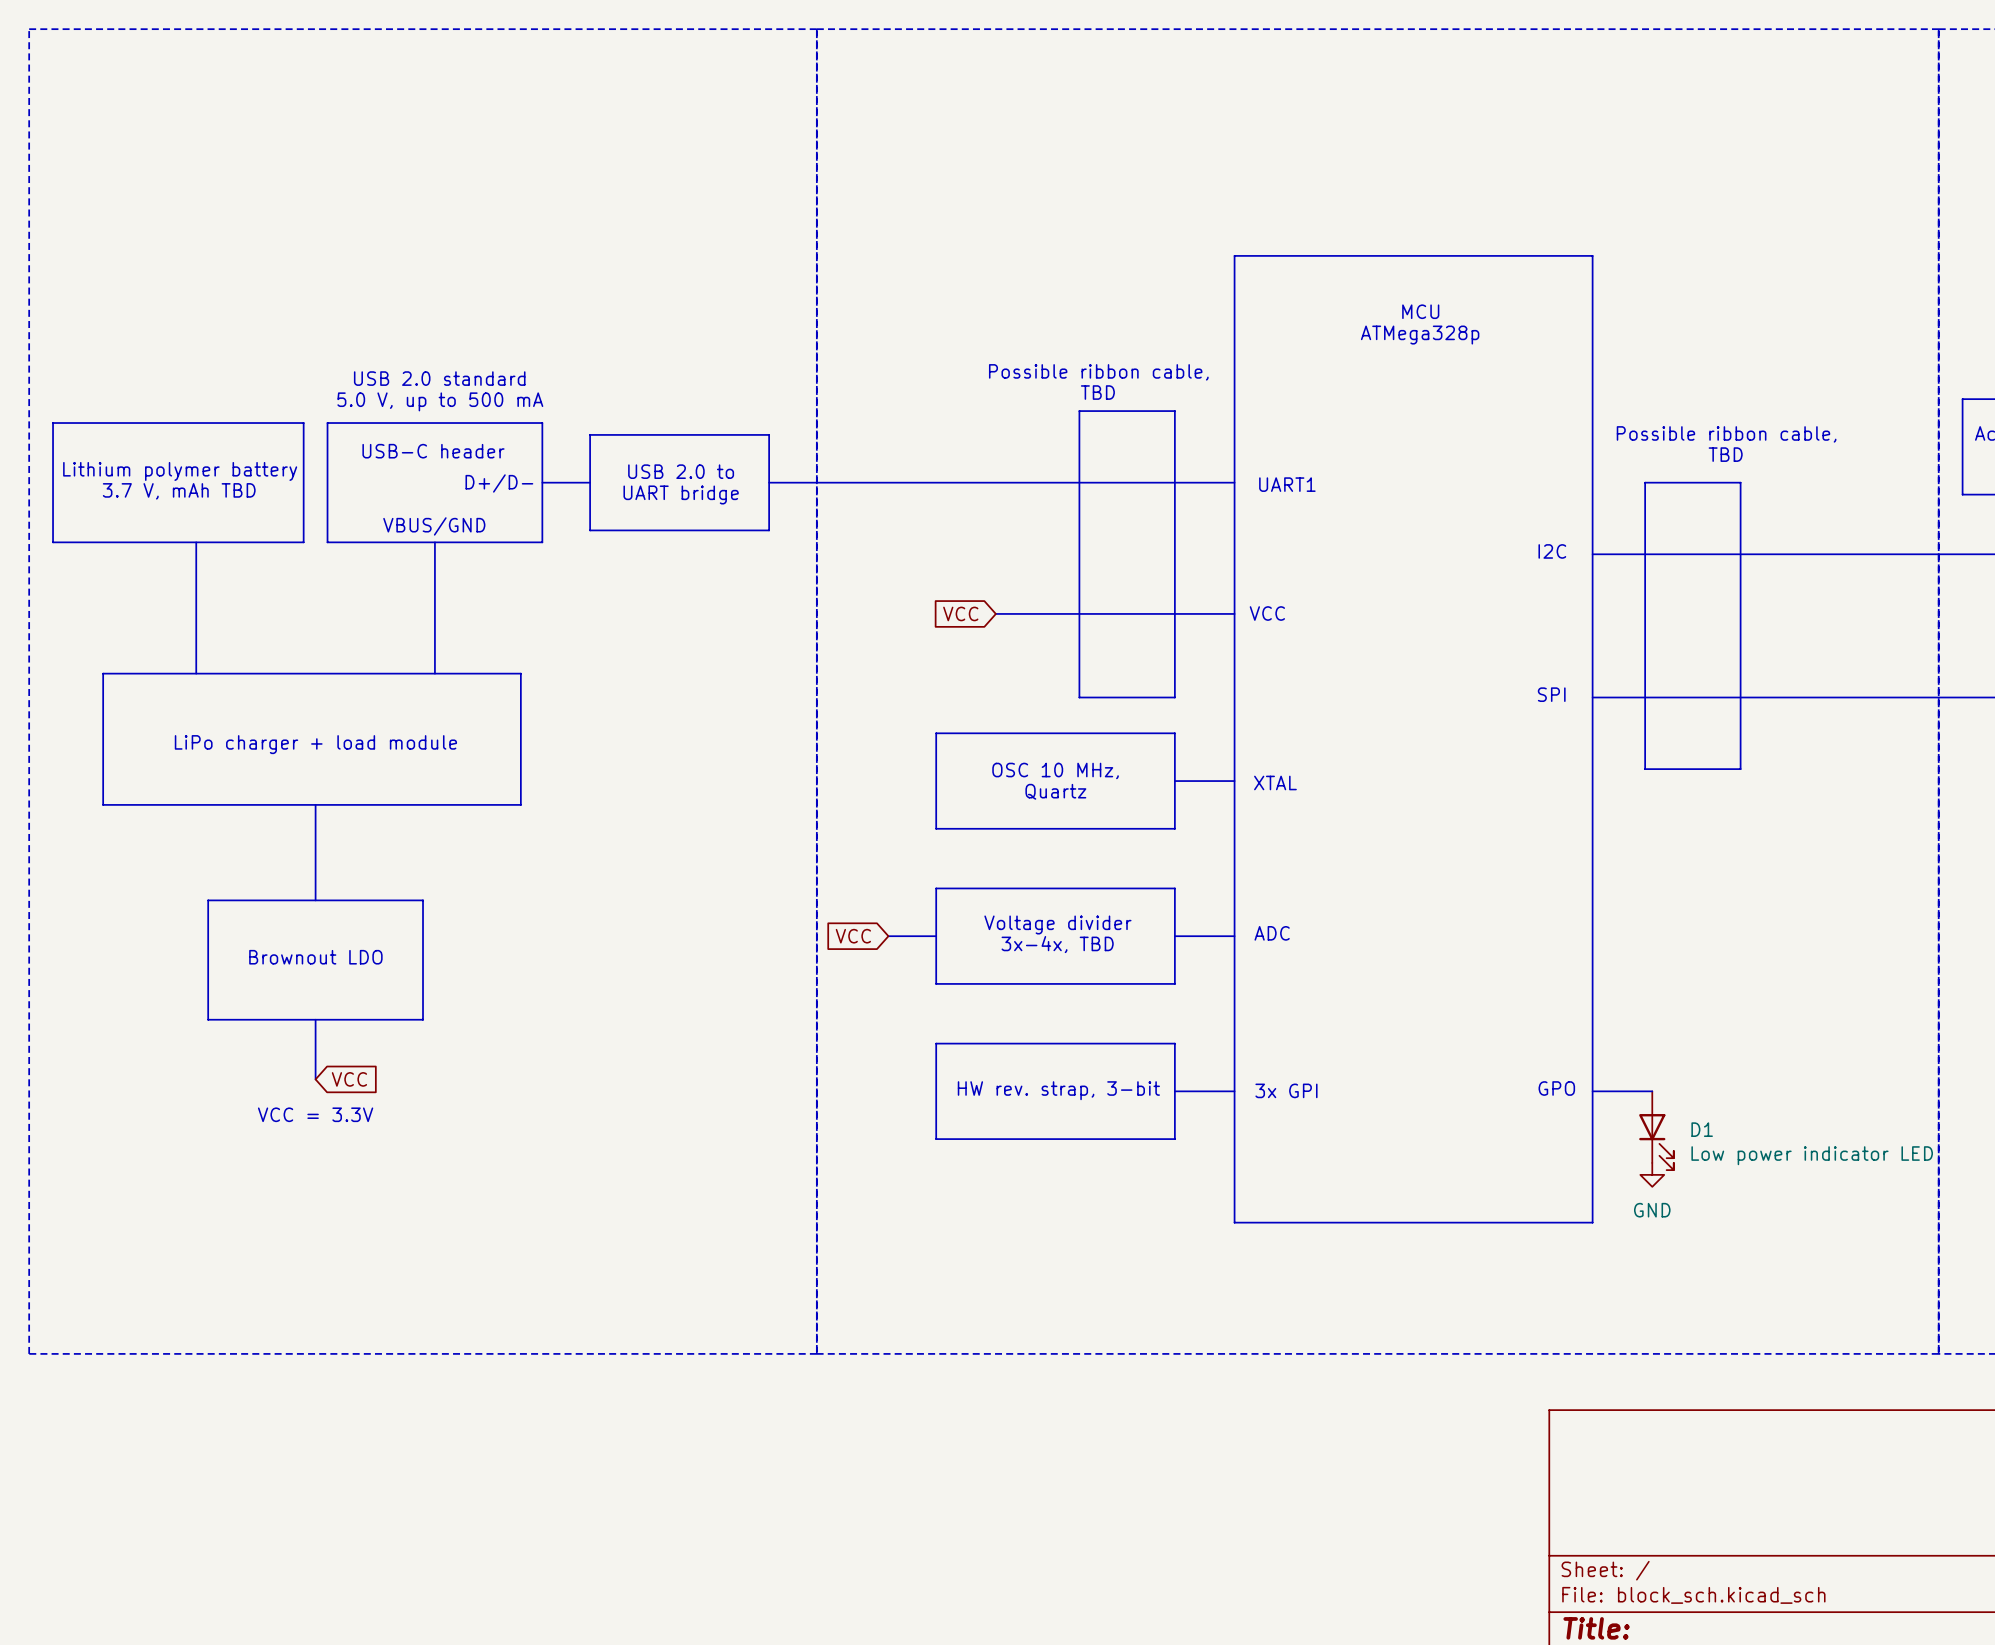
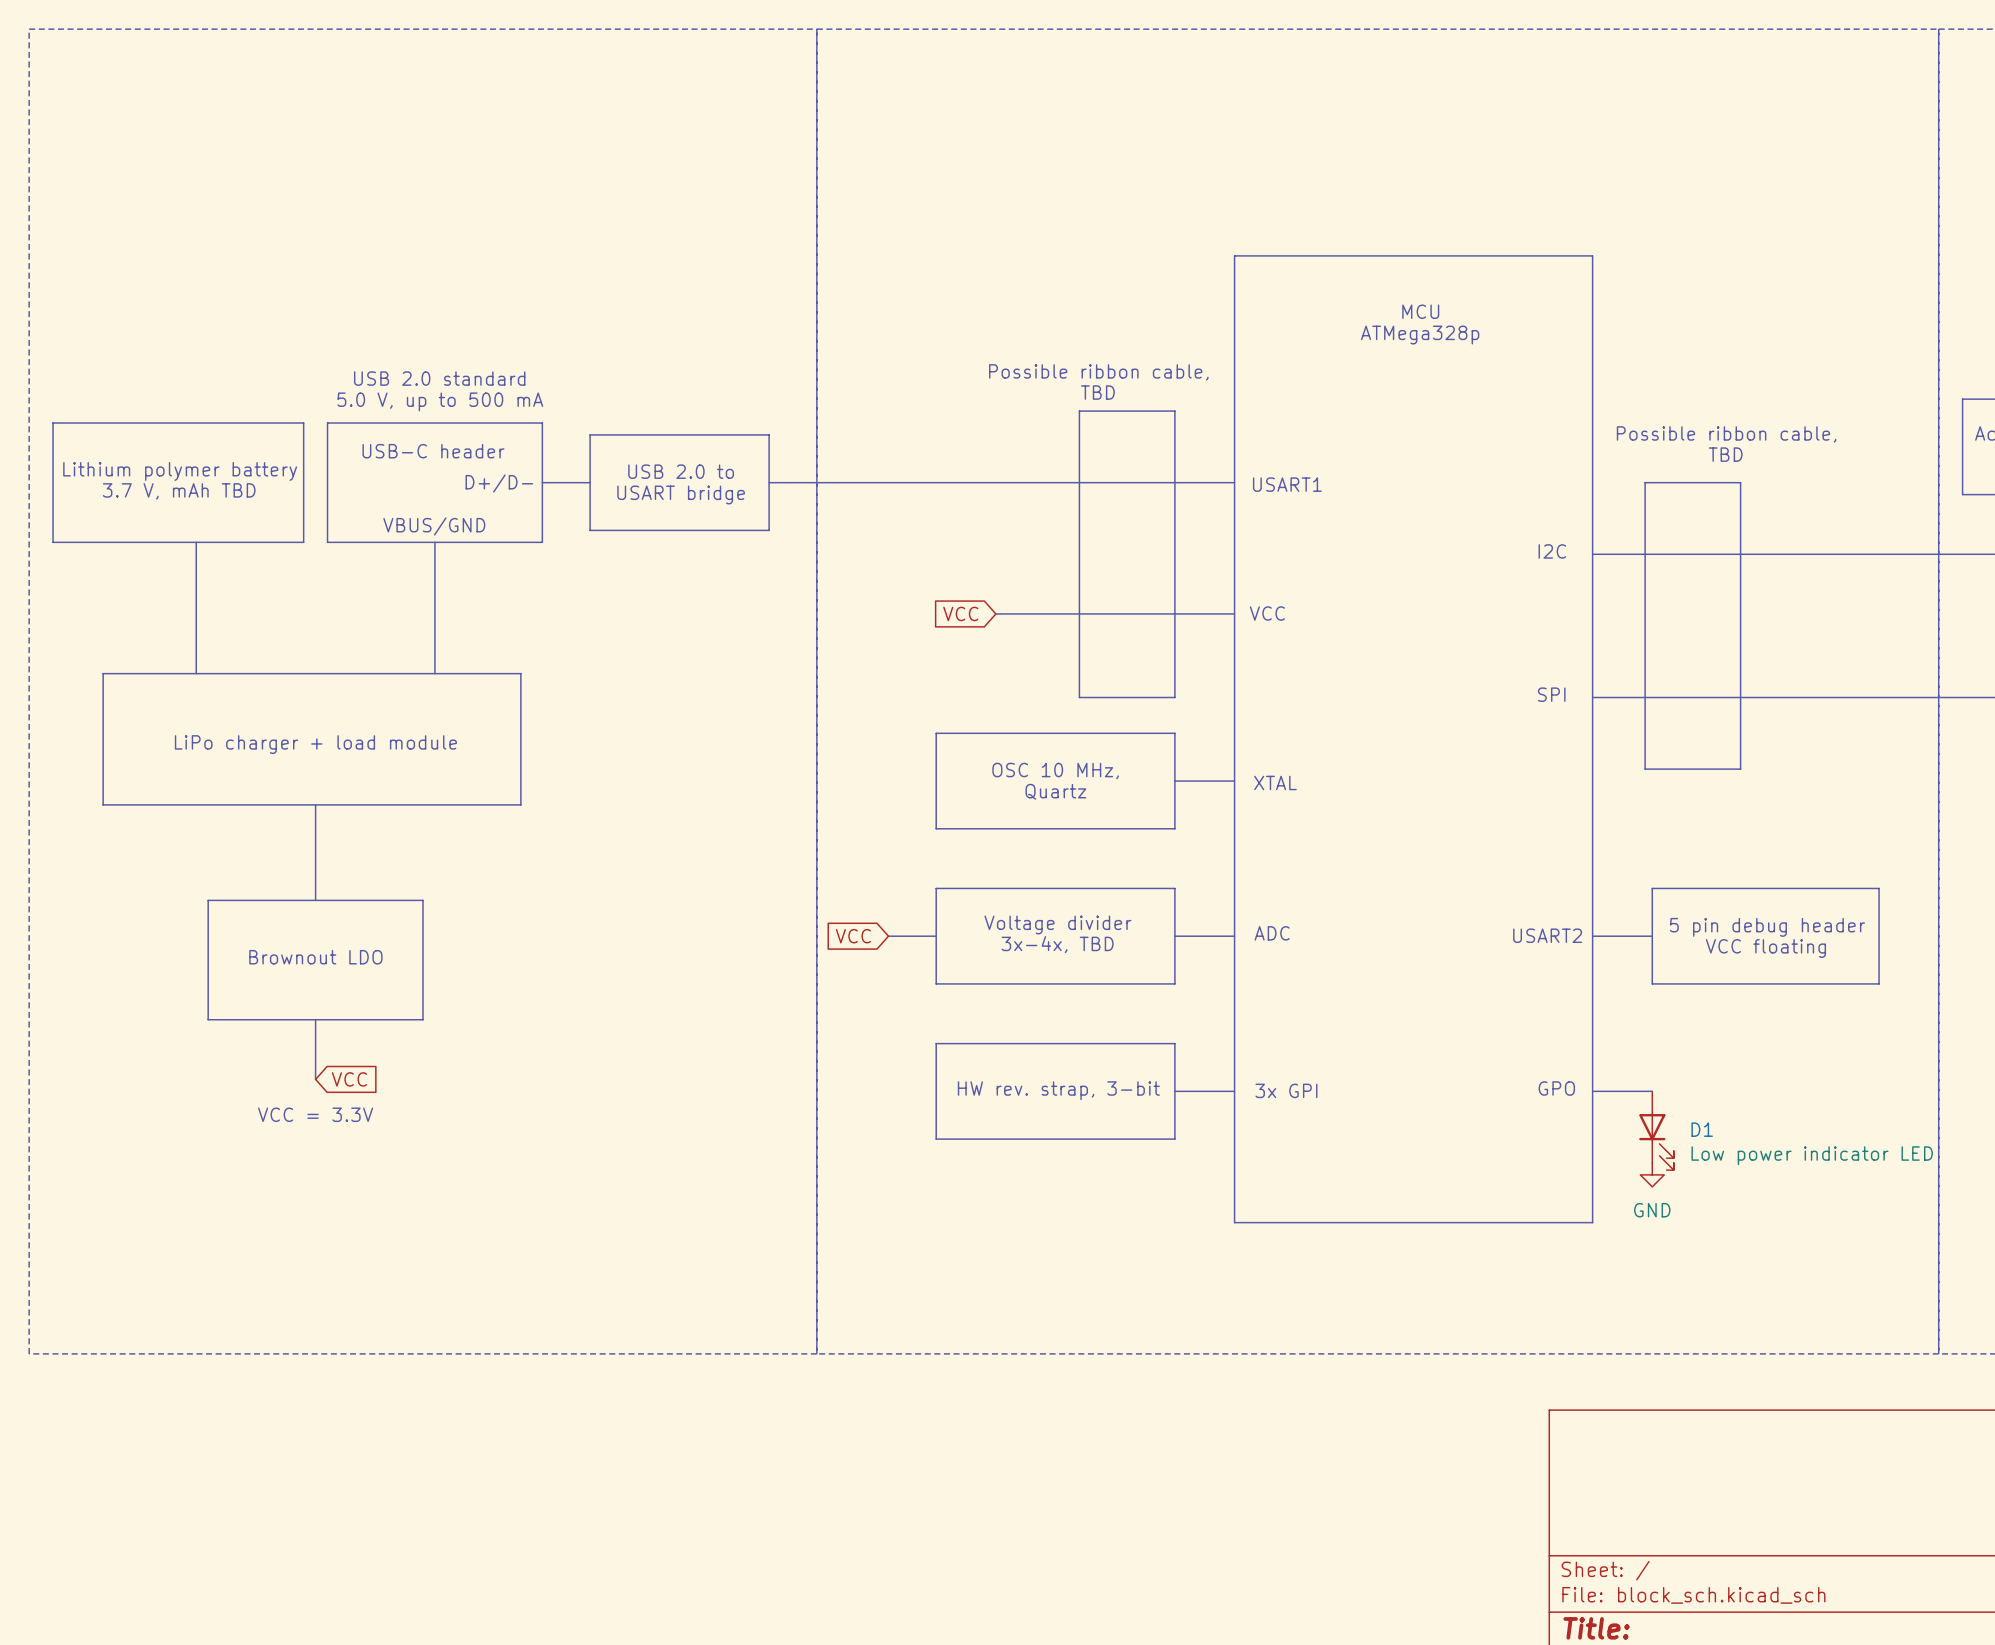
text: UART1 (1287, 484) -> USART1 (1287, 484)
text: UART bridge (681, 494) -> USART bridge (681, 494)
line: none -> (1652, 888) (1879, 888) (1879, 983) (1652, 983) (1652, 888)
text: none -> 5 pin debug header (1767, 927)
text: none -> USART2 (1547, 935)
bus: none -> (1592, 936) (1652, 936)
text: none -> VCC floating (1765, 948)

